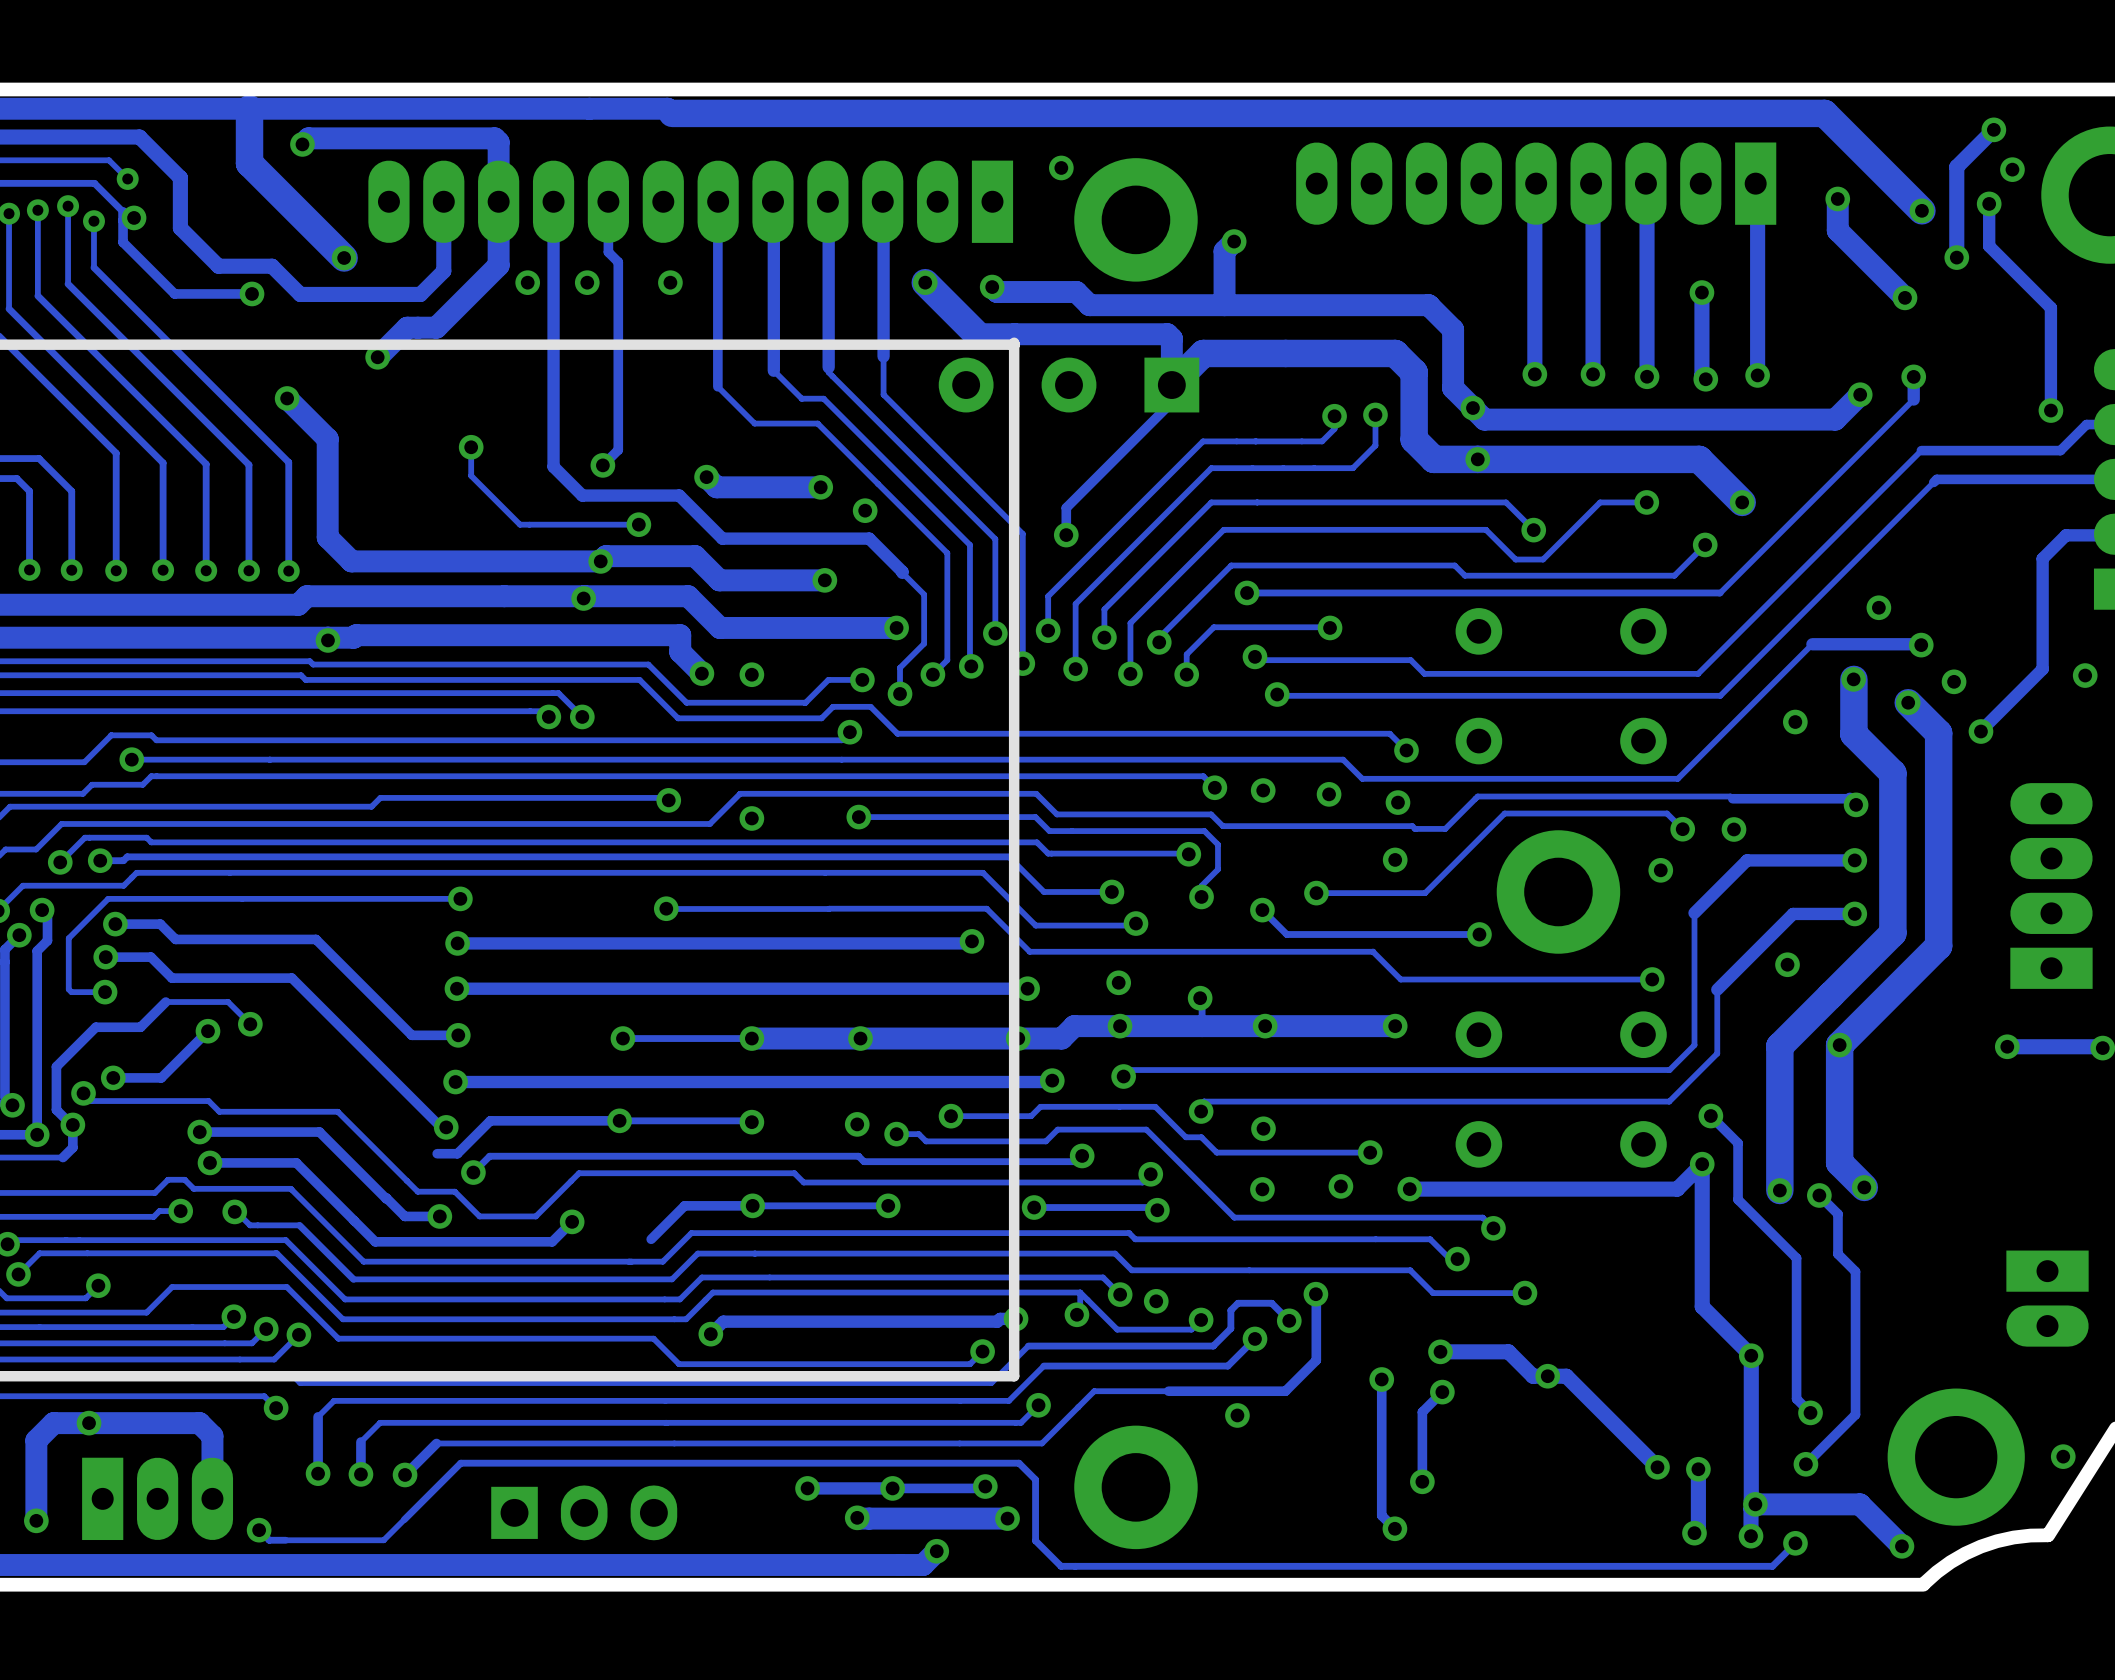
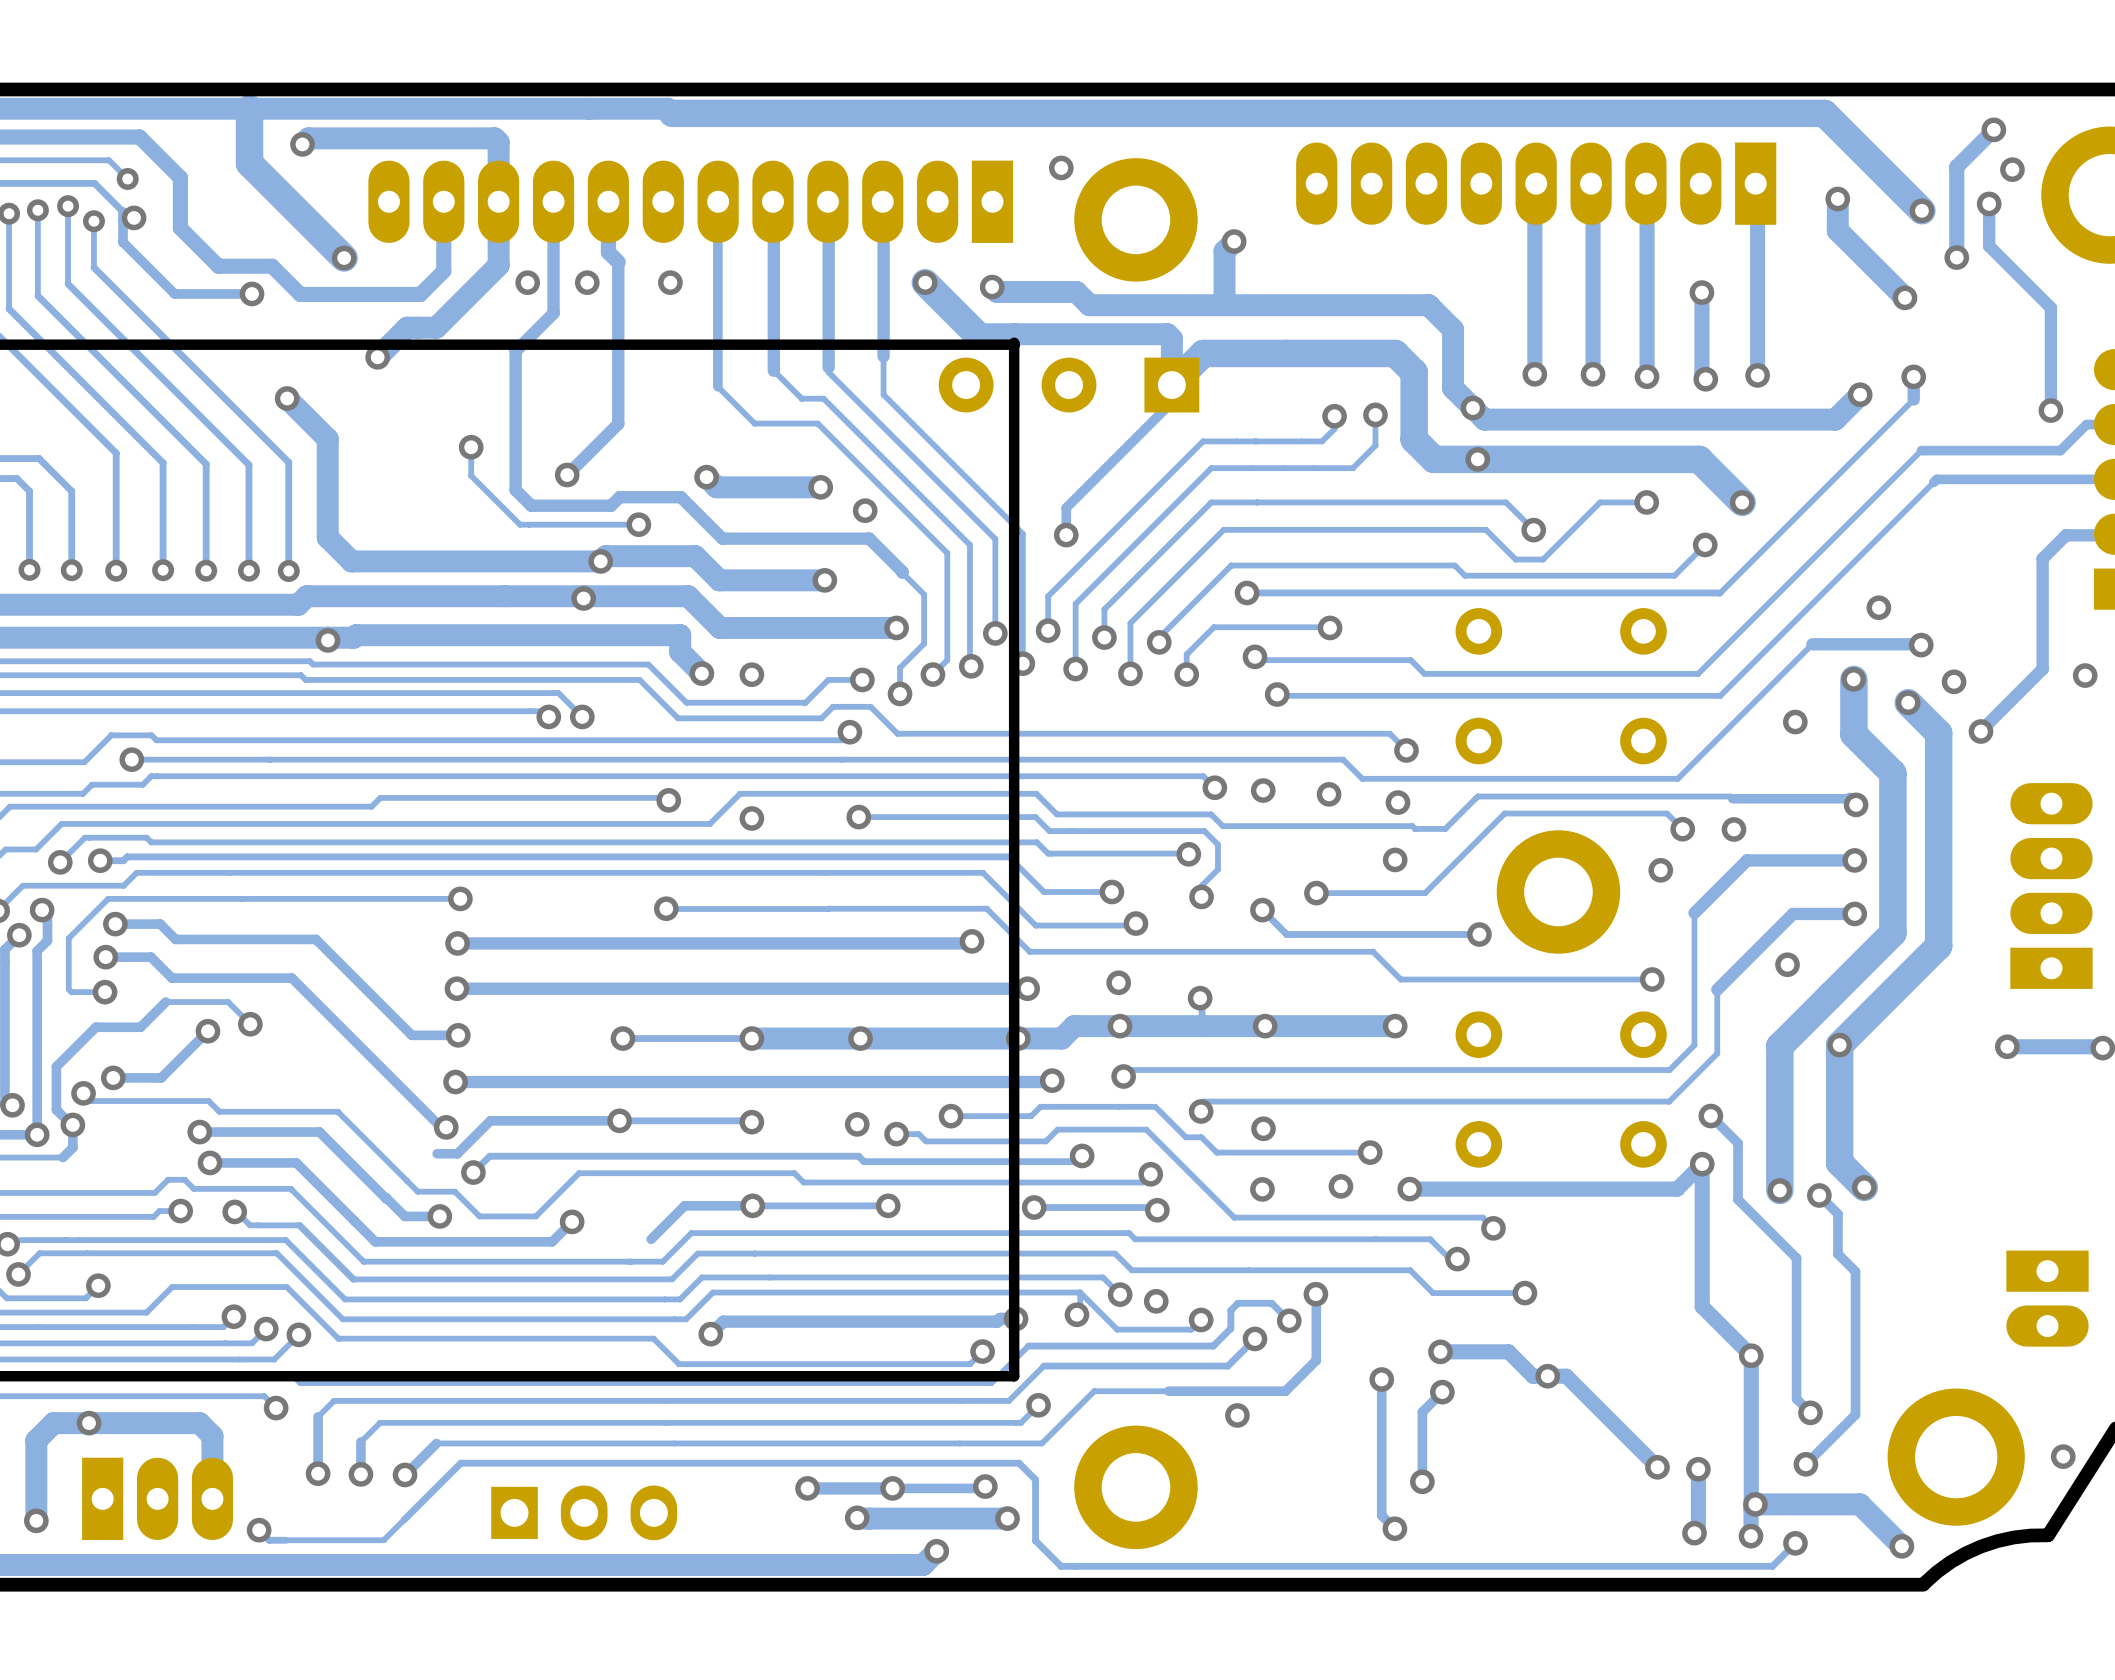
track width: thin (608, 201) (608, 252) (618, 262) (618, 423) -> thick (608, 201) (608, 252) (618, 262) (618, 423)
track: (553, 313) (553, 466) (582, 495) (679, 495) (681, 497) -> (553, 313) (515, 351) (515, 490) (531, 505) (611, 505) (619, 497) (681, 497)
track: (618, 423) (618, 449) (602, 465) -> (618, 423) (567, 475)
via position: (602, 465) -> (567, 475)

